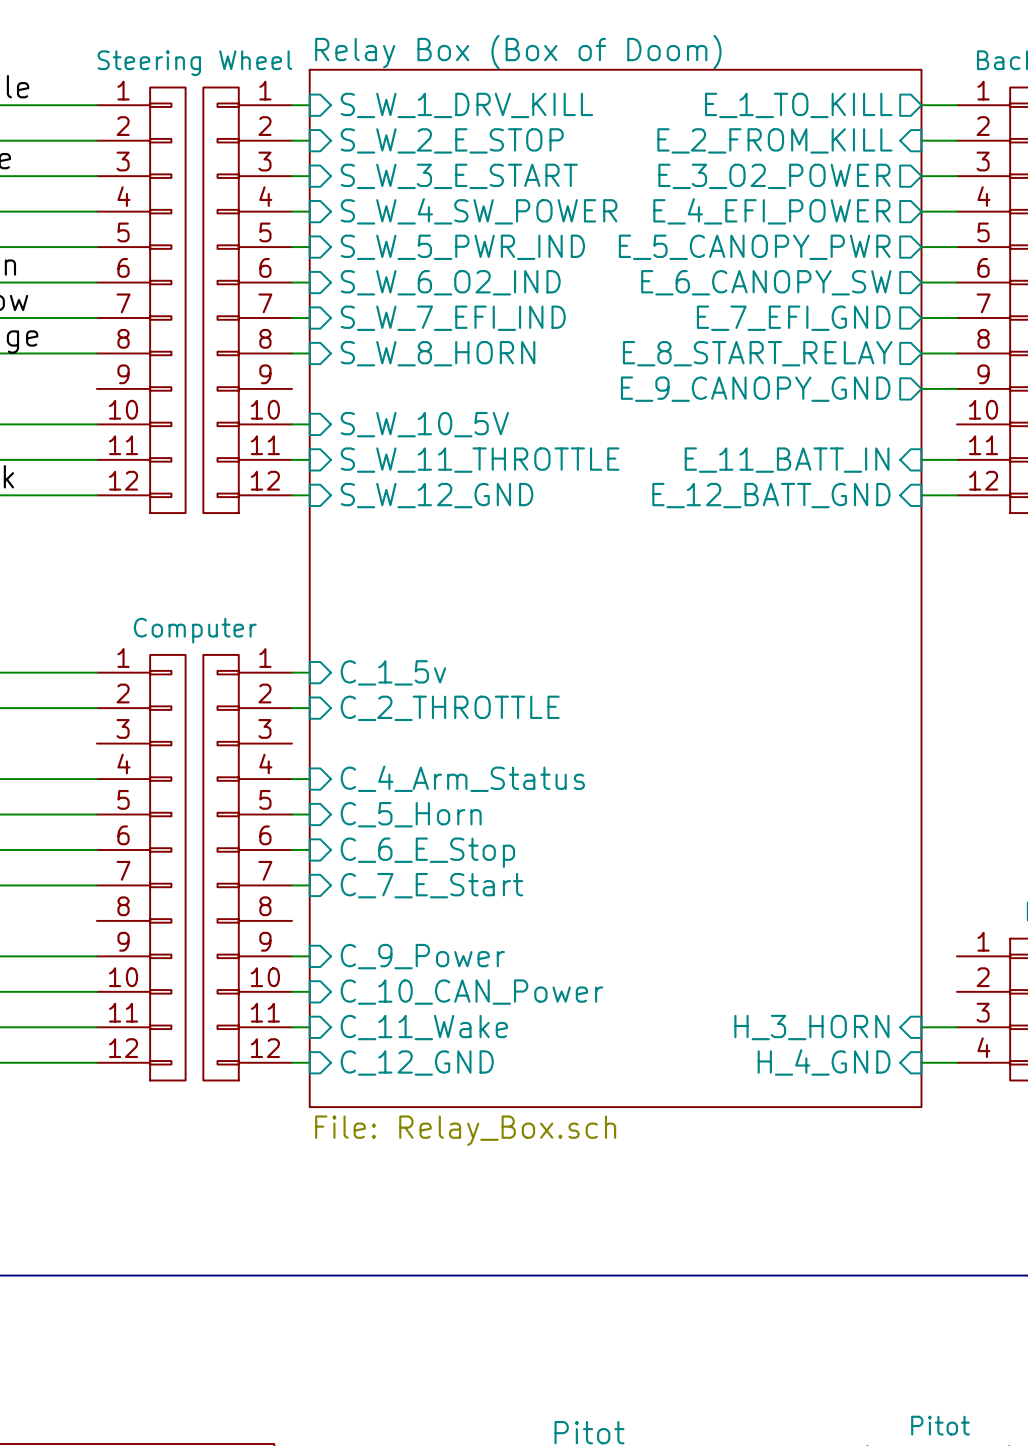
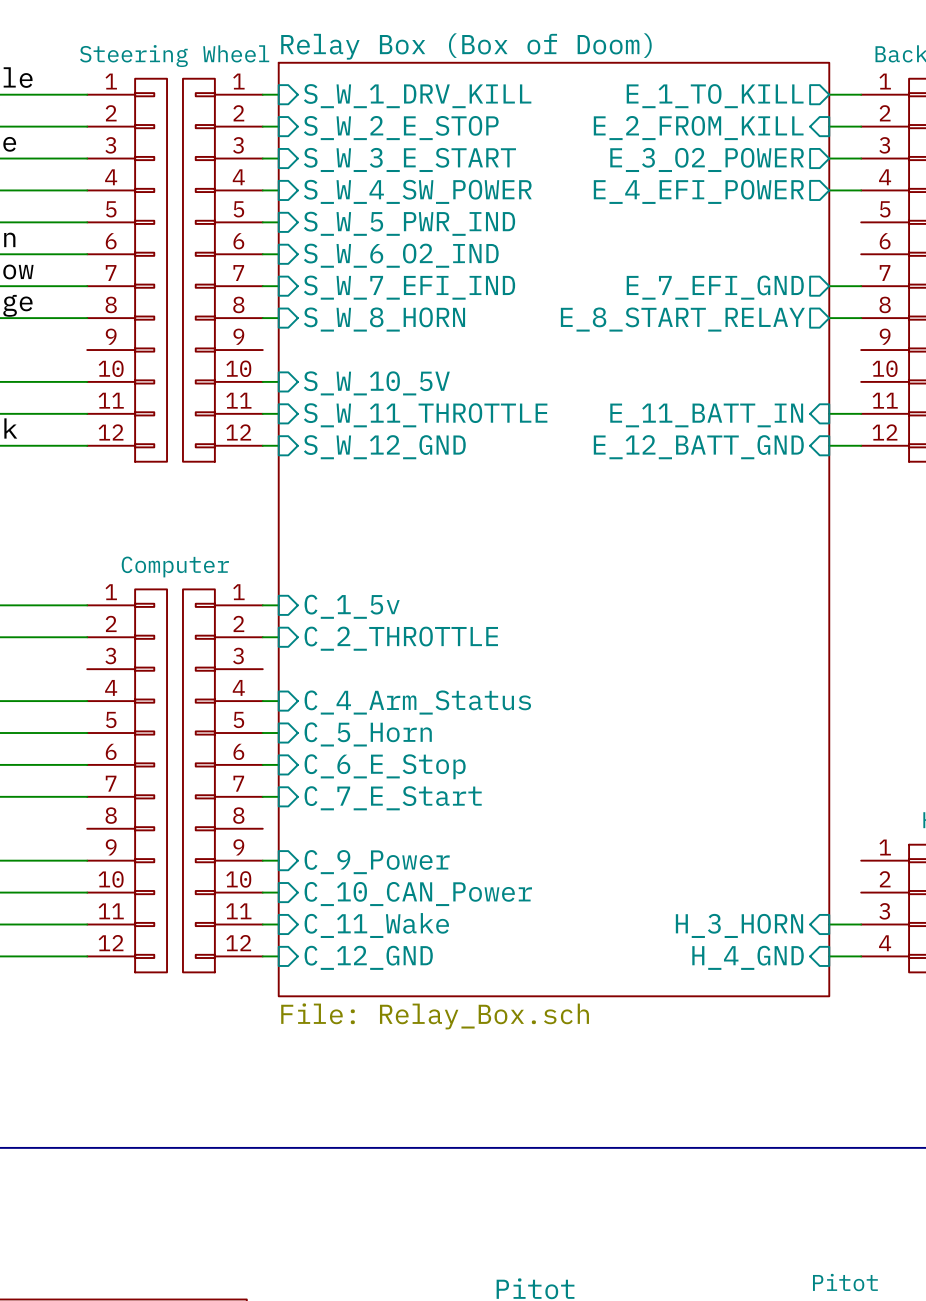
sheet pin: E_5_CANOPY_PWR (754, 247) -> none
wire: (921, 247) (956, 247) -> none
sheet pin: E_6_CANOPY_SW (766, 282) -> none
wire: (921, 282) (956, 282) -> none
wire: (921, 388) (956, 388) -> none
sheet pin: E_9_CANOPY_GND (755, 389) -> none

